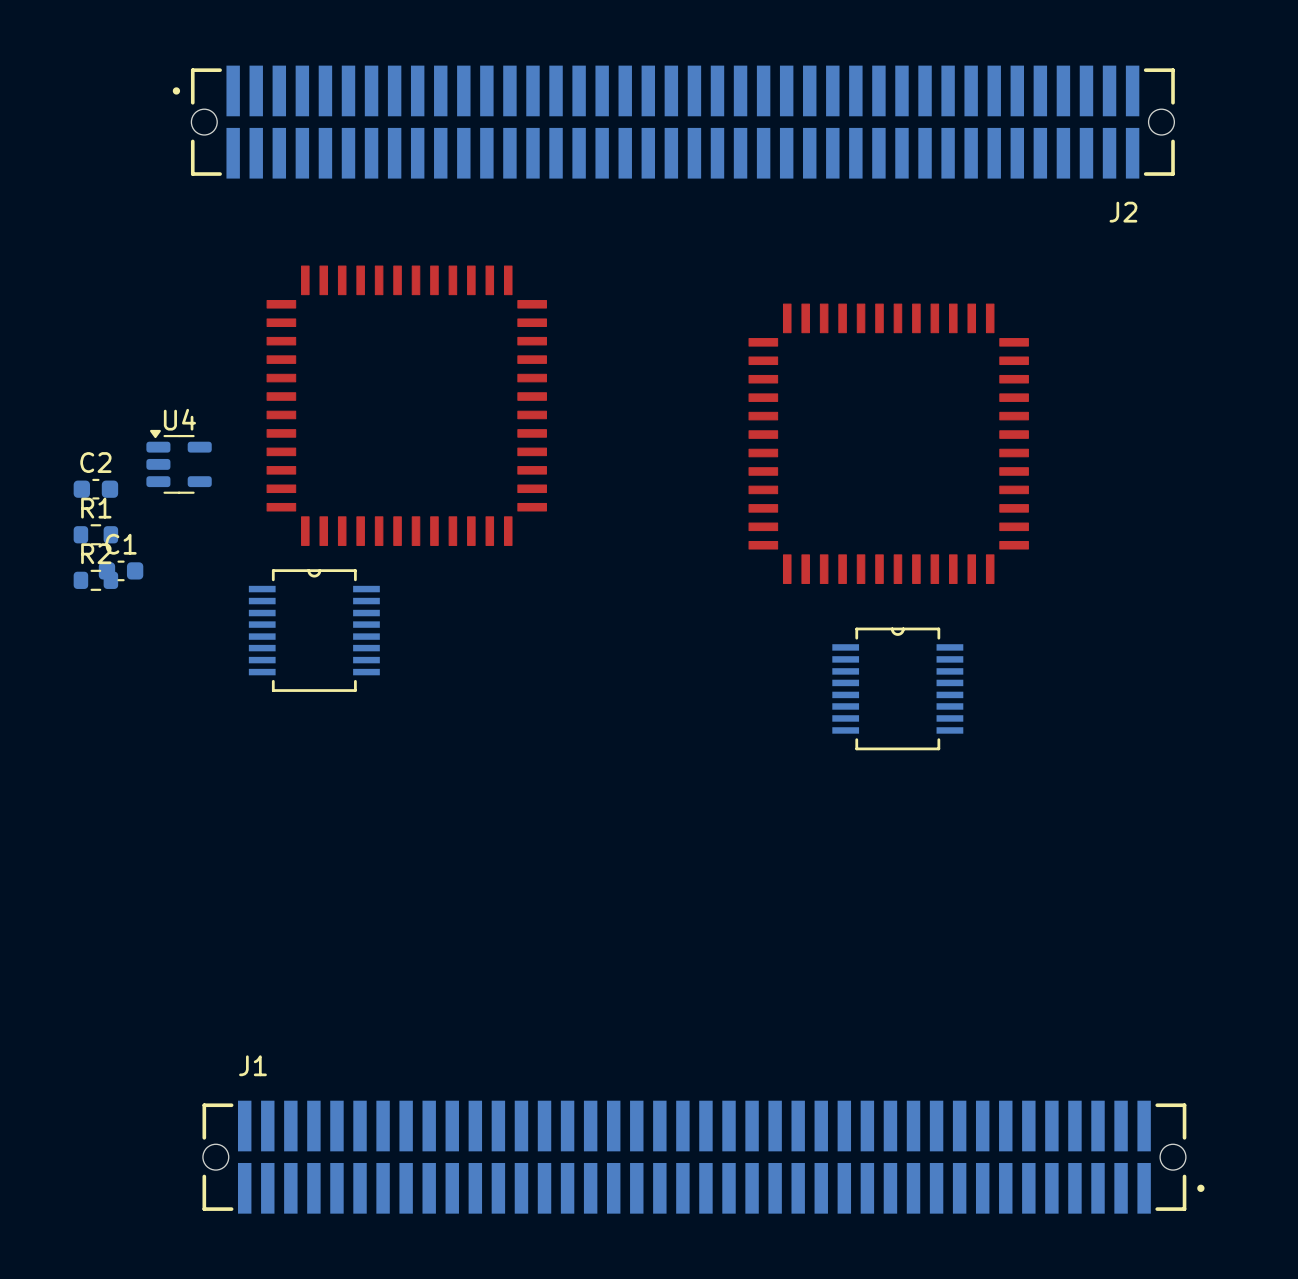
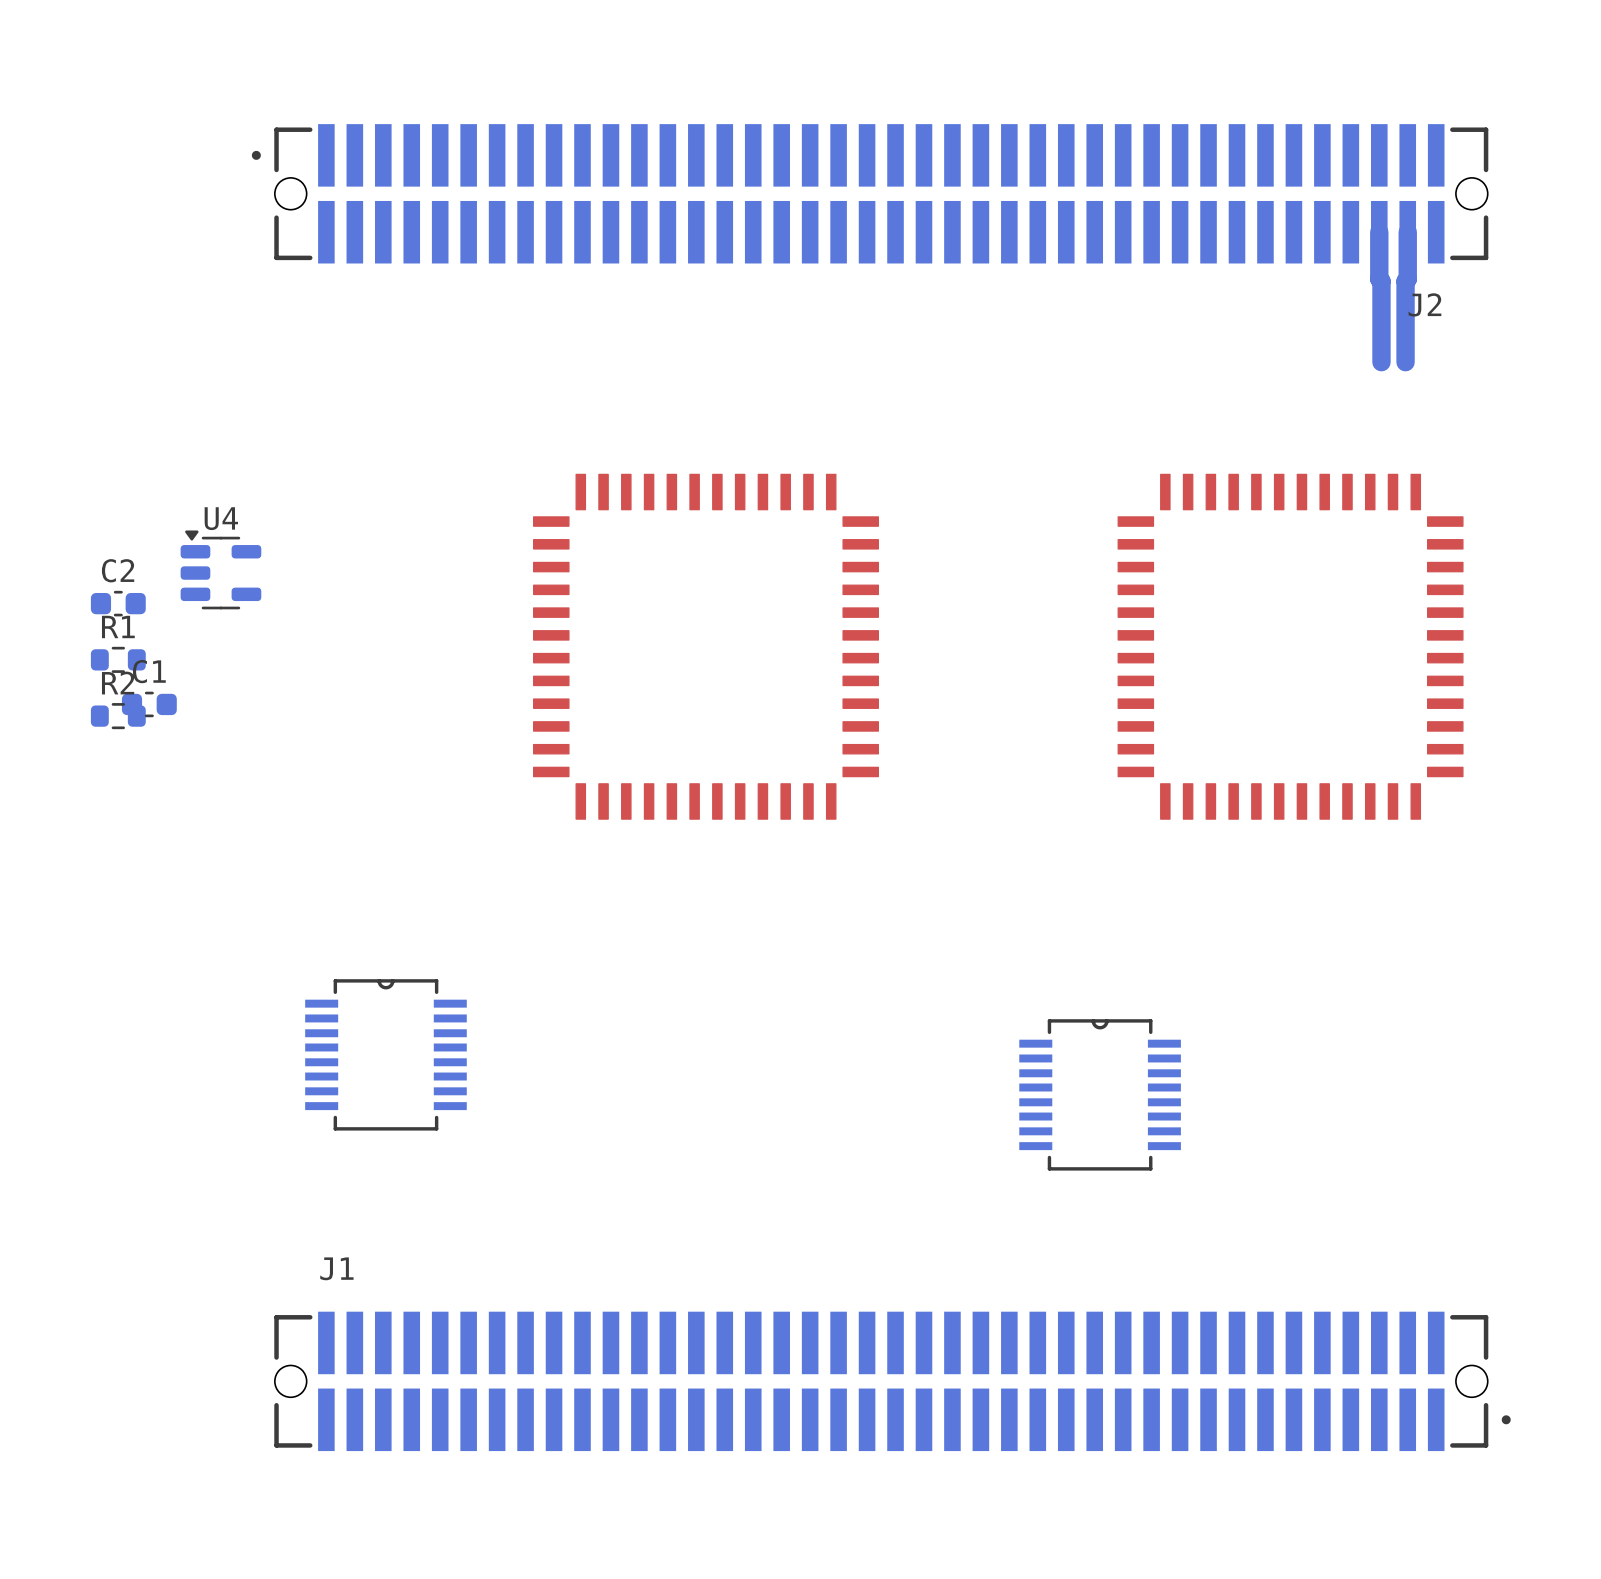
J2 position: (673, 122) -> (870, 193)
bottom track: none -> (1379, 232) (1381, 362)
bottom track: none -> (1407, 232) (1405, 362)
part: (406, 405) -> none
part: (888, 443) -> none
part: none -> (706, 646)
part: none -> (1290, 646)
part position: (314, 630) -> (385, 1054)
part position: (897, 688) -> (1100, 1094)
J1 position: (703, 1157) -> (892, 1381)

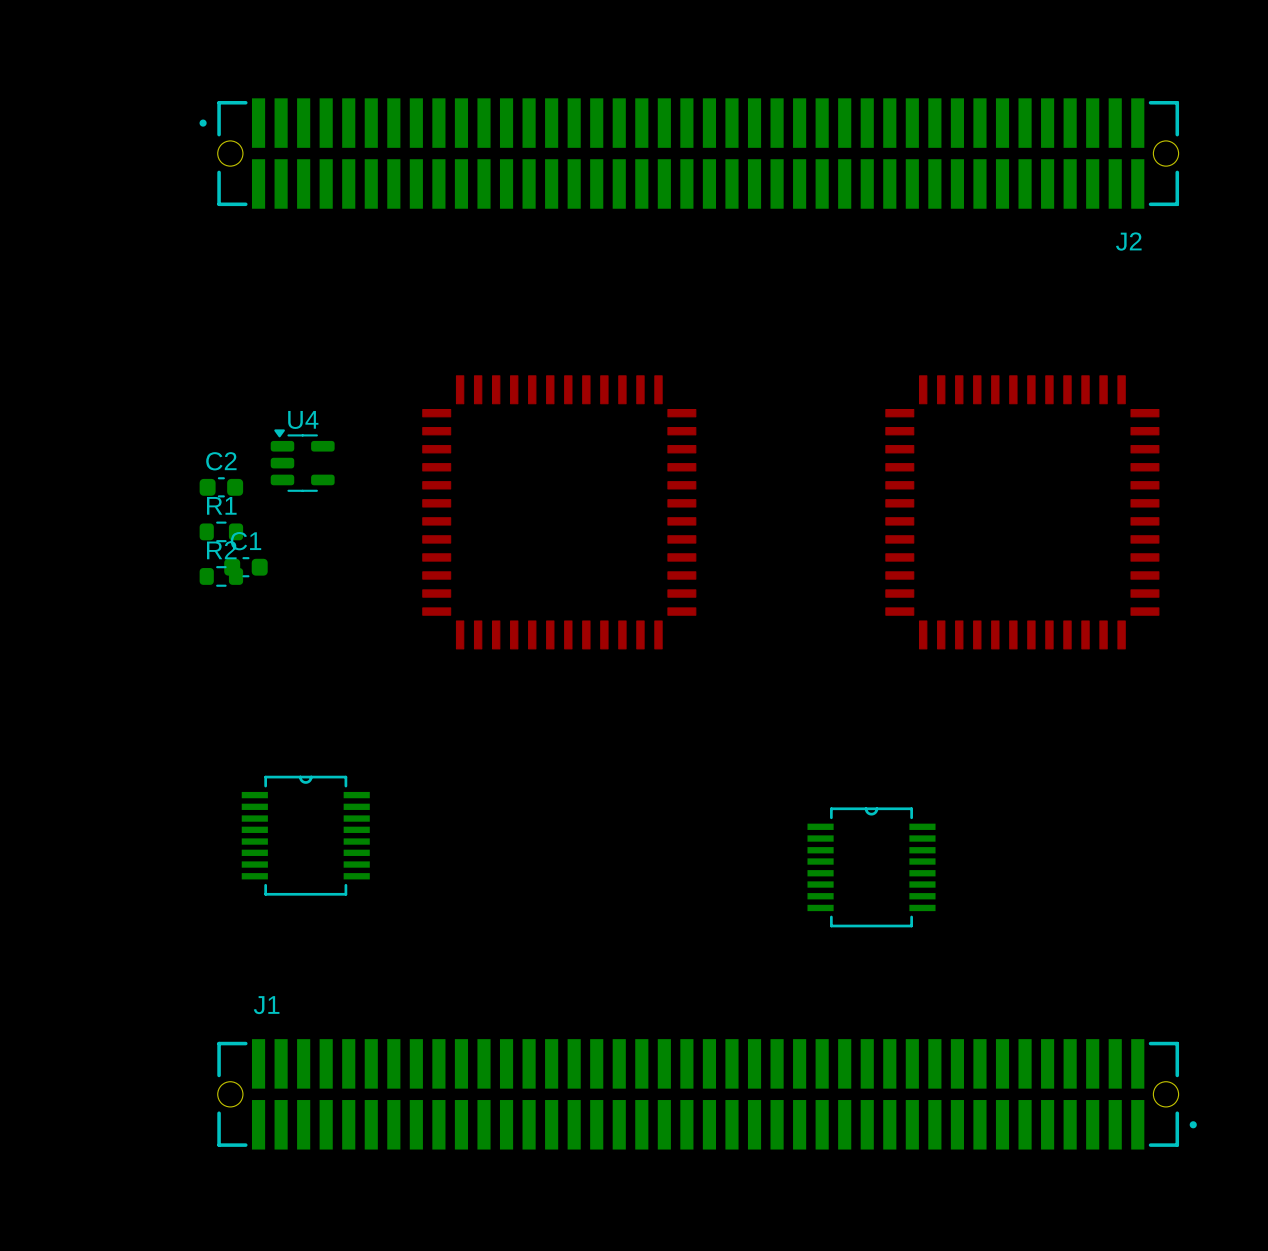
bottom track: (1379, 232) (1381, 362) -> none
bottom track: (1407, 232) (1405, 362) -> none
U4 position: (220, 569) -> (302, 460)
C2 position: (118, 603) -> (221, 487)
R1 position: (118, 659) -> (221, 531)
C1 position: (149, 704) -> (245, 567)
R2 position: (118, 716) -> (221, 576)

